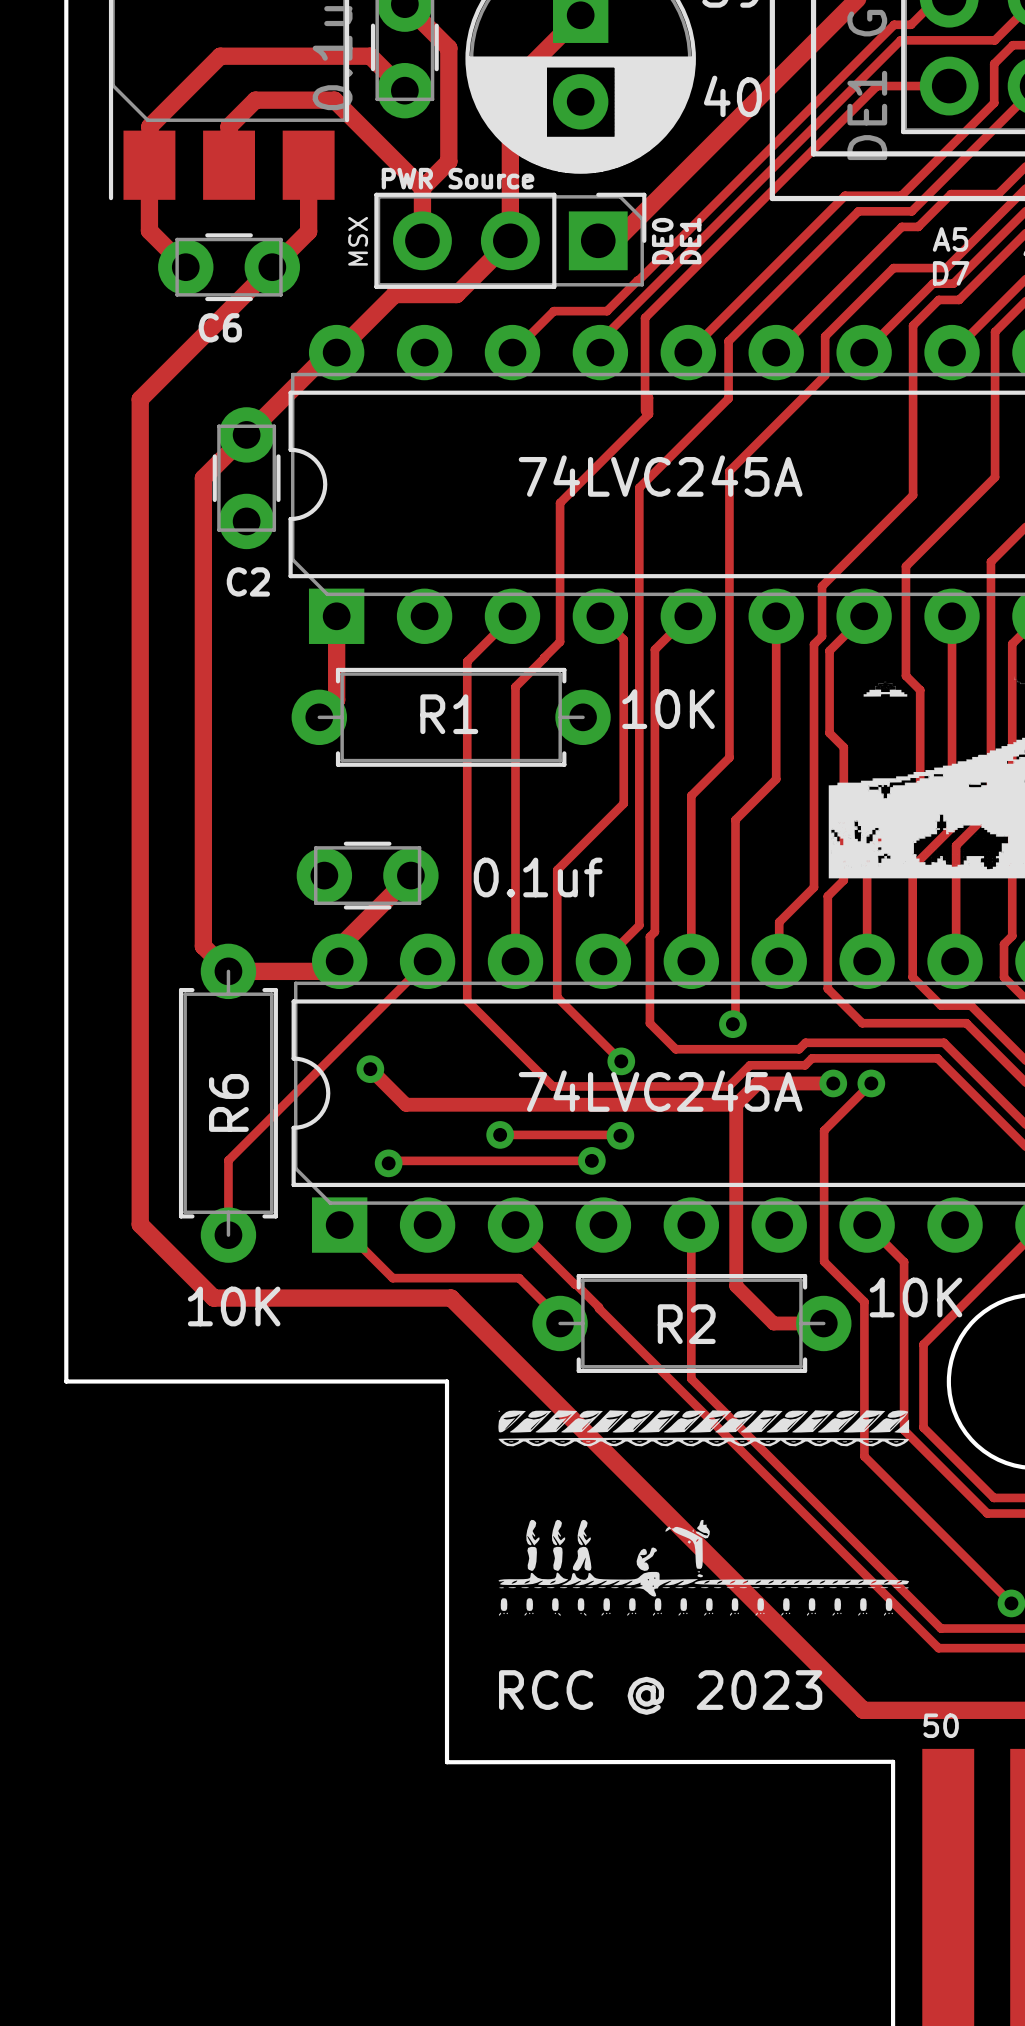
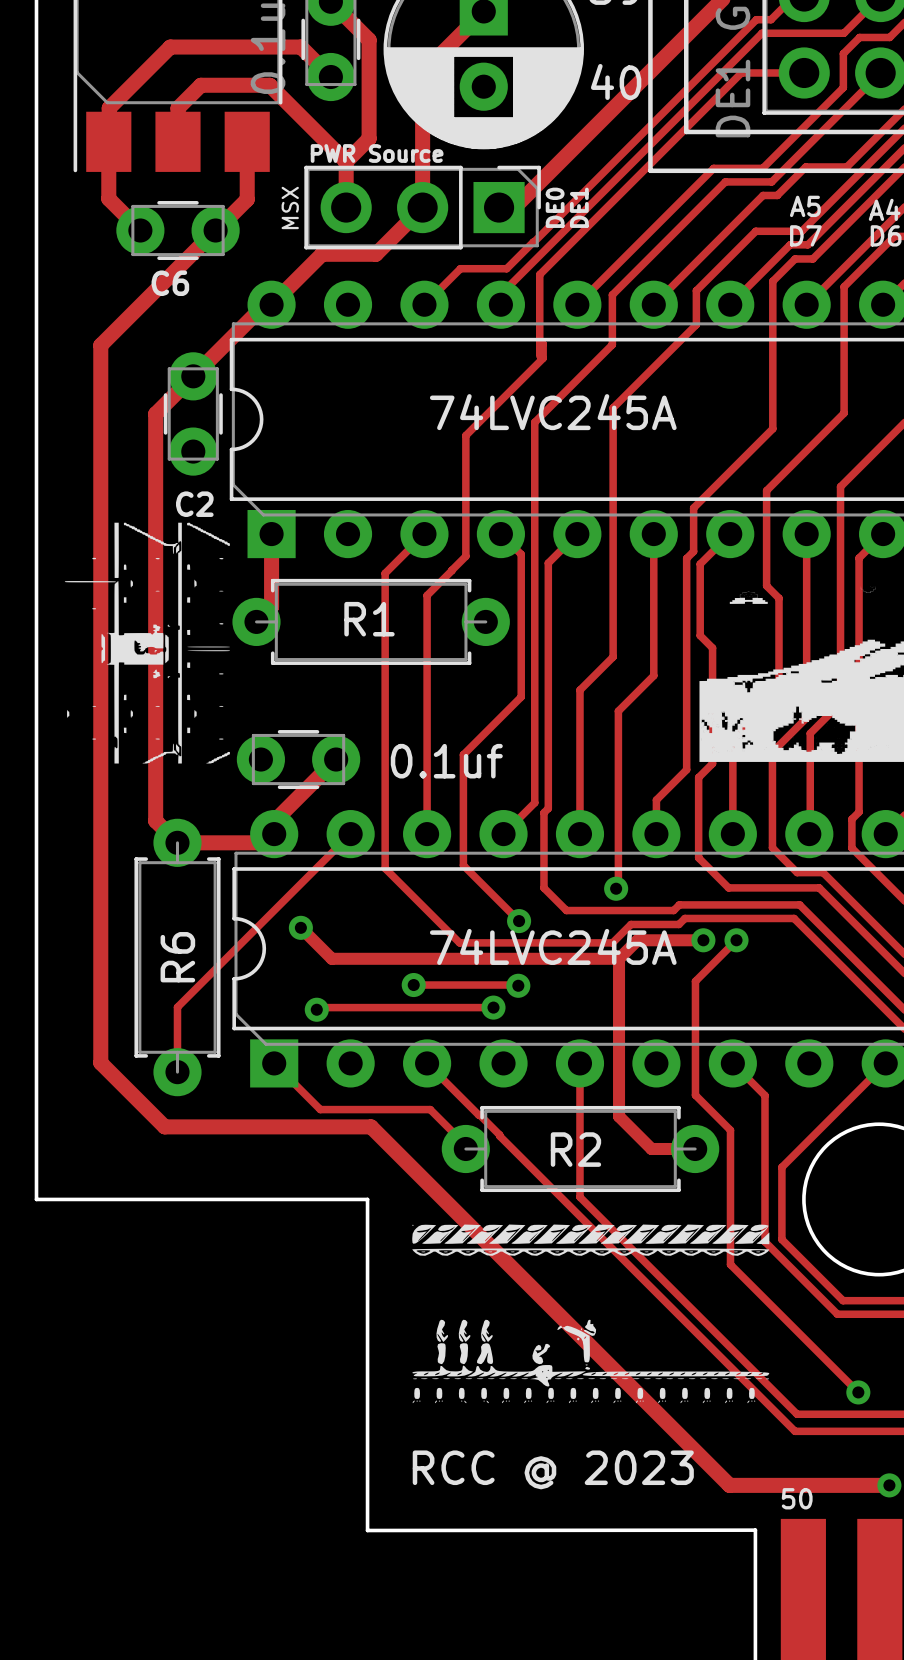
drawing: none -> [64, 522, 230, 764]
R1 value: 10K (668, 709) -> none
R2 value: 10K (915, 1297) -> none
R6 value: 10K (234, 1306) -> none

